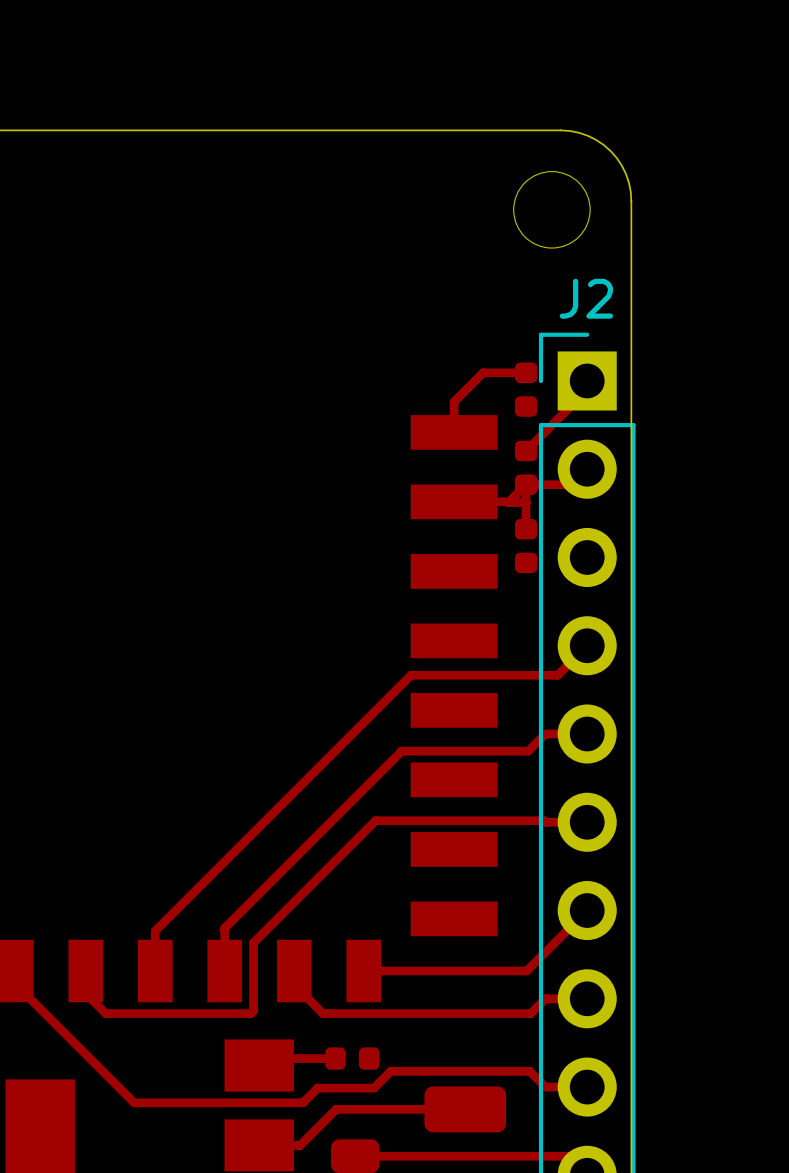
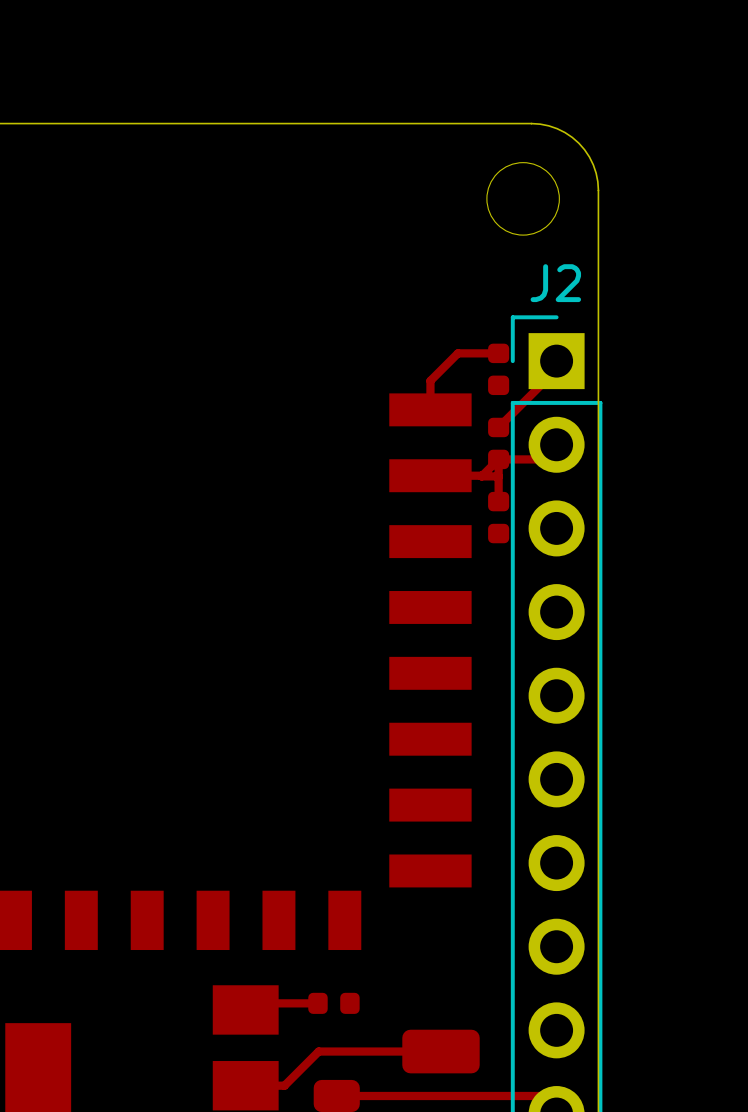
top track: (587, 645) (557, 675) (411, 675) (155, 931) (155, 970) -> none
top track: (587, 734) (545, 734) (528, 751) (401, 751) (224, 928) (224, 970) -> none
top track: (587, 822) (375, 820) (253, 942) (253, 1011) (251, 1013) (105, 1013) (85, 993) (85, 970) -> none
top track: (587, 910) (526, 970) (363, 970) -> none
top track: (16, 970) (16, 984) (134, 1102) (303, 1102) (317, 1088) (373, 1088) (390, 1071) (529, 1071) (545, 1087) (587, 1087) -> none
top track: (294, 970) (294, 984) (322, 1013) (530, 1013) (545, 998) (587, 998) -> none

